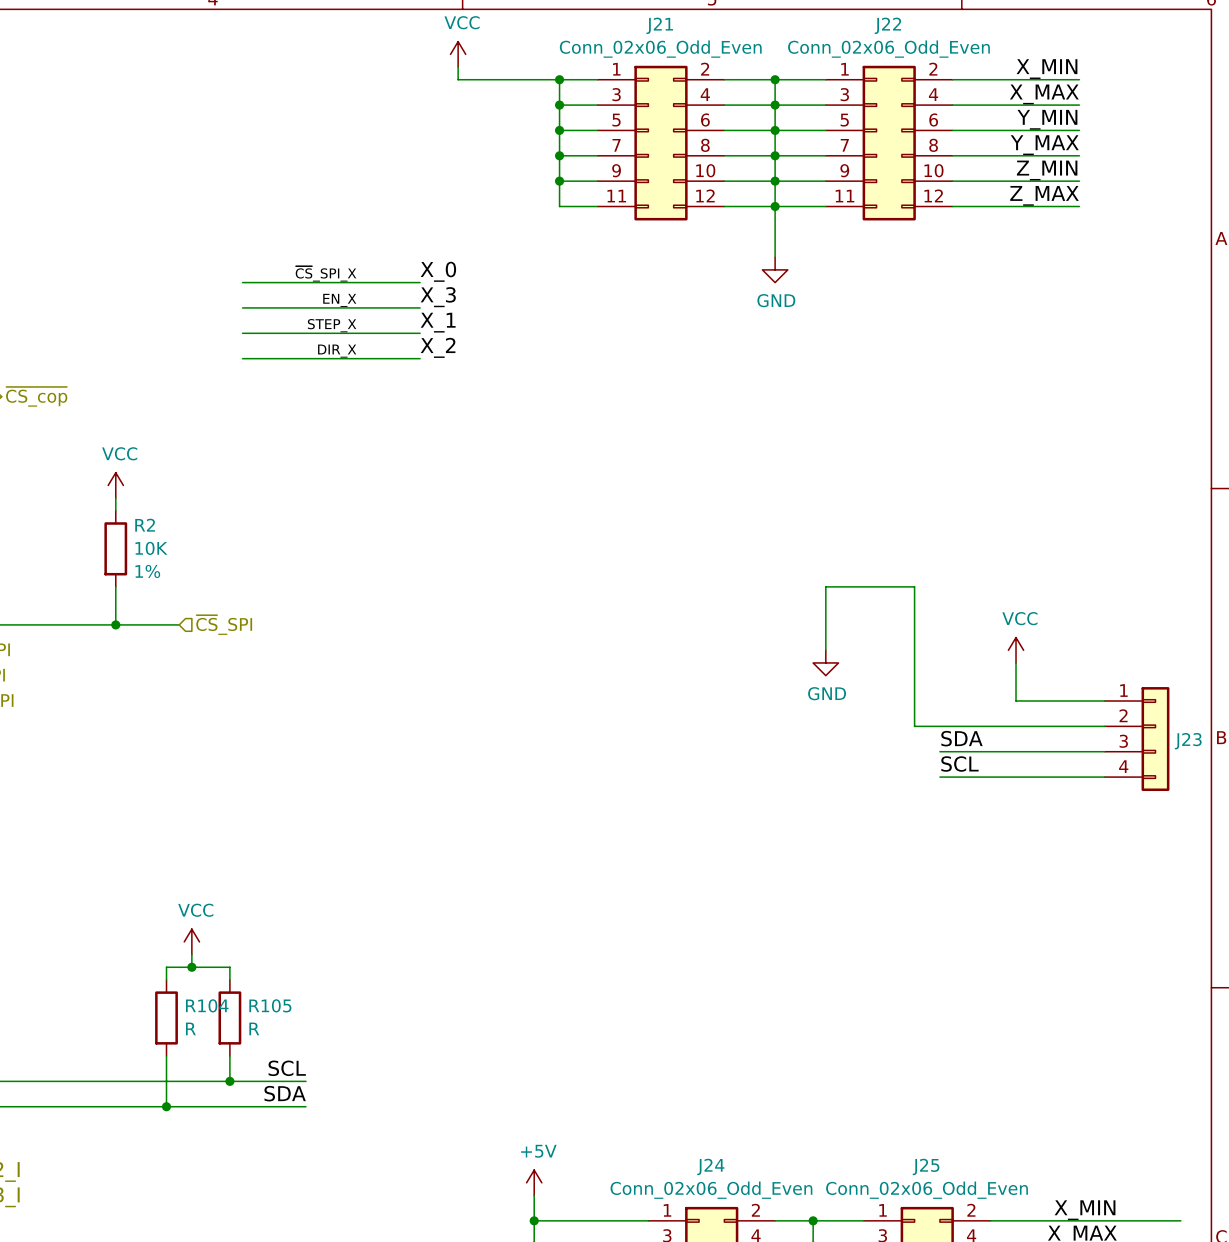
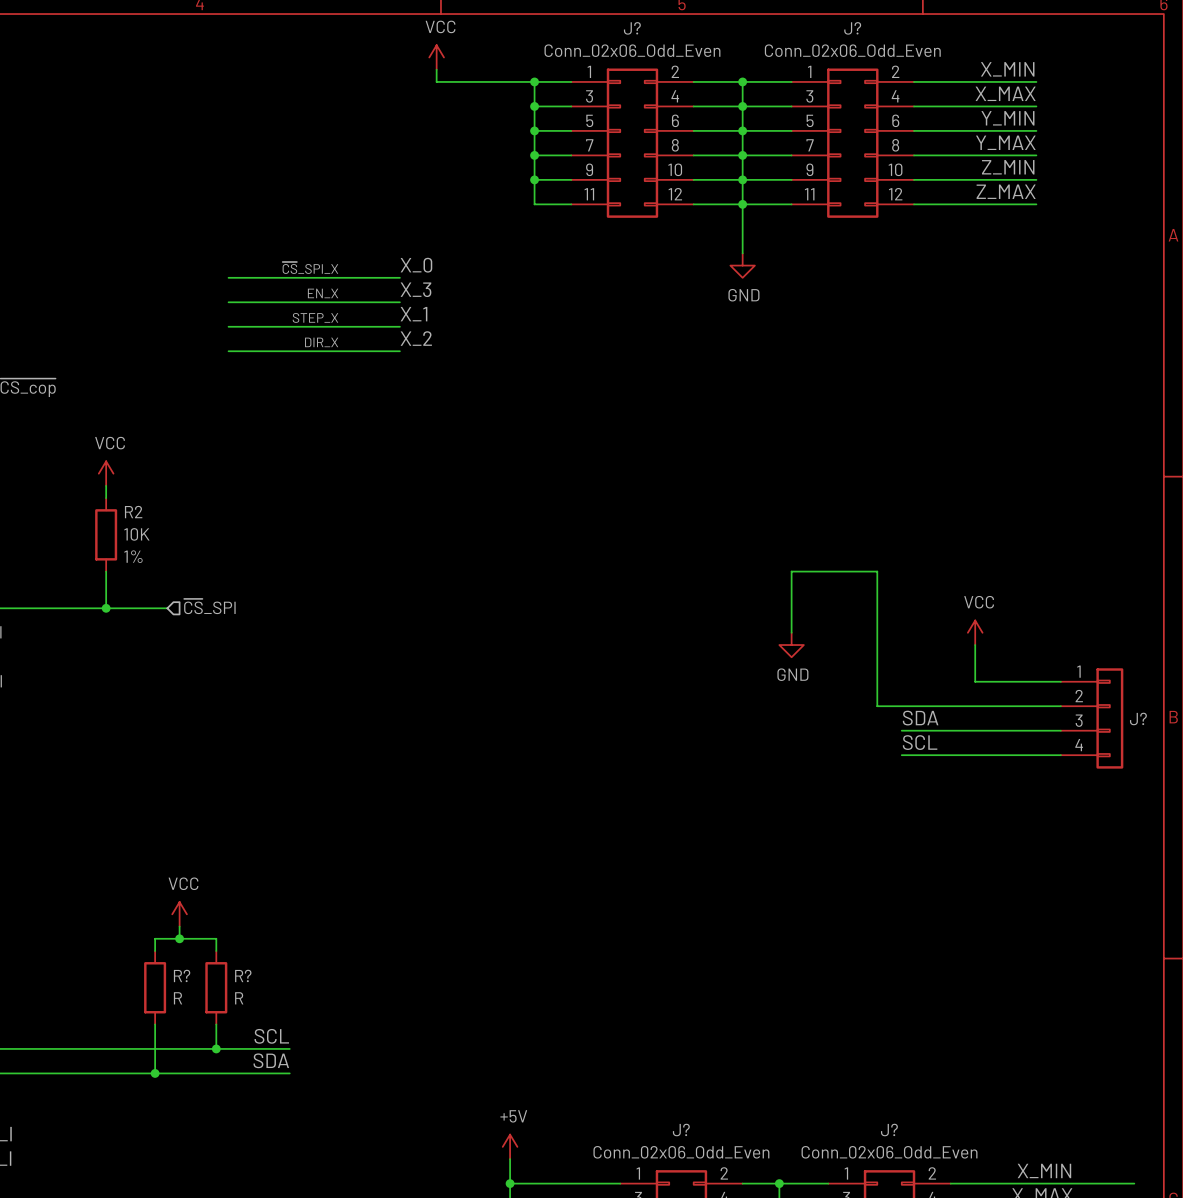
J21 name: J21 (659, 25) -> J? (632, 28)
J22 name: J22 (887, 25) -> J? (852, 28)
J23 name: J23 (1188, 741) -> J? (1138, 718)
R104 name: R104 (207, 1005) -> R? (182, 975)
R105 name: R105 (270, 1005) -> R? (243, 975)
J24 name: J24 (710, 1166) -> J? (681, 1130)
J25 name: J25 (926, 1166) -> J? (889, 1130)

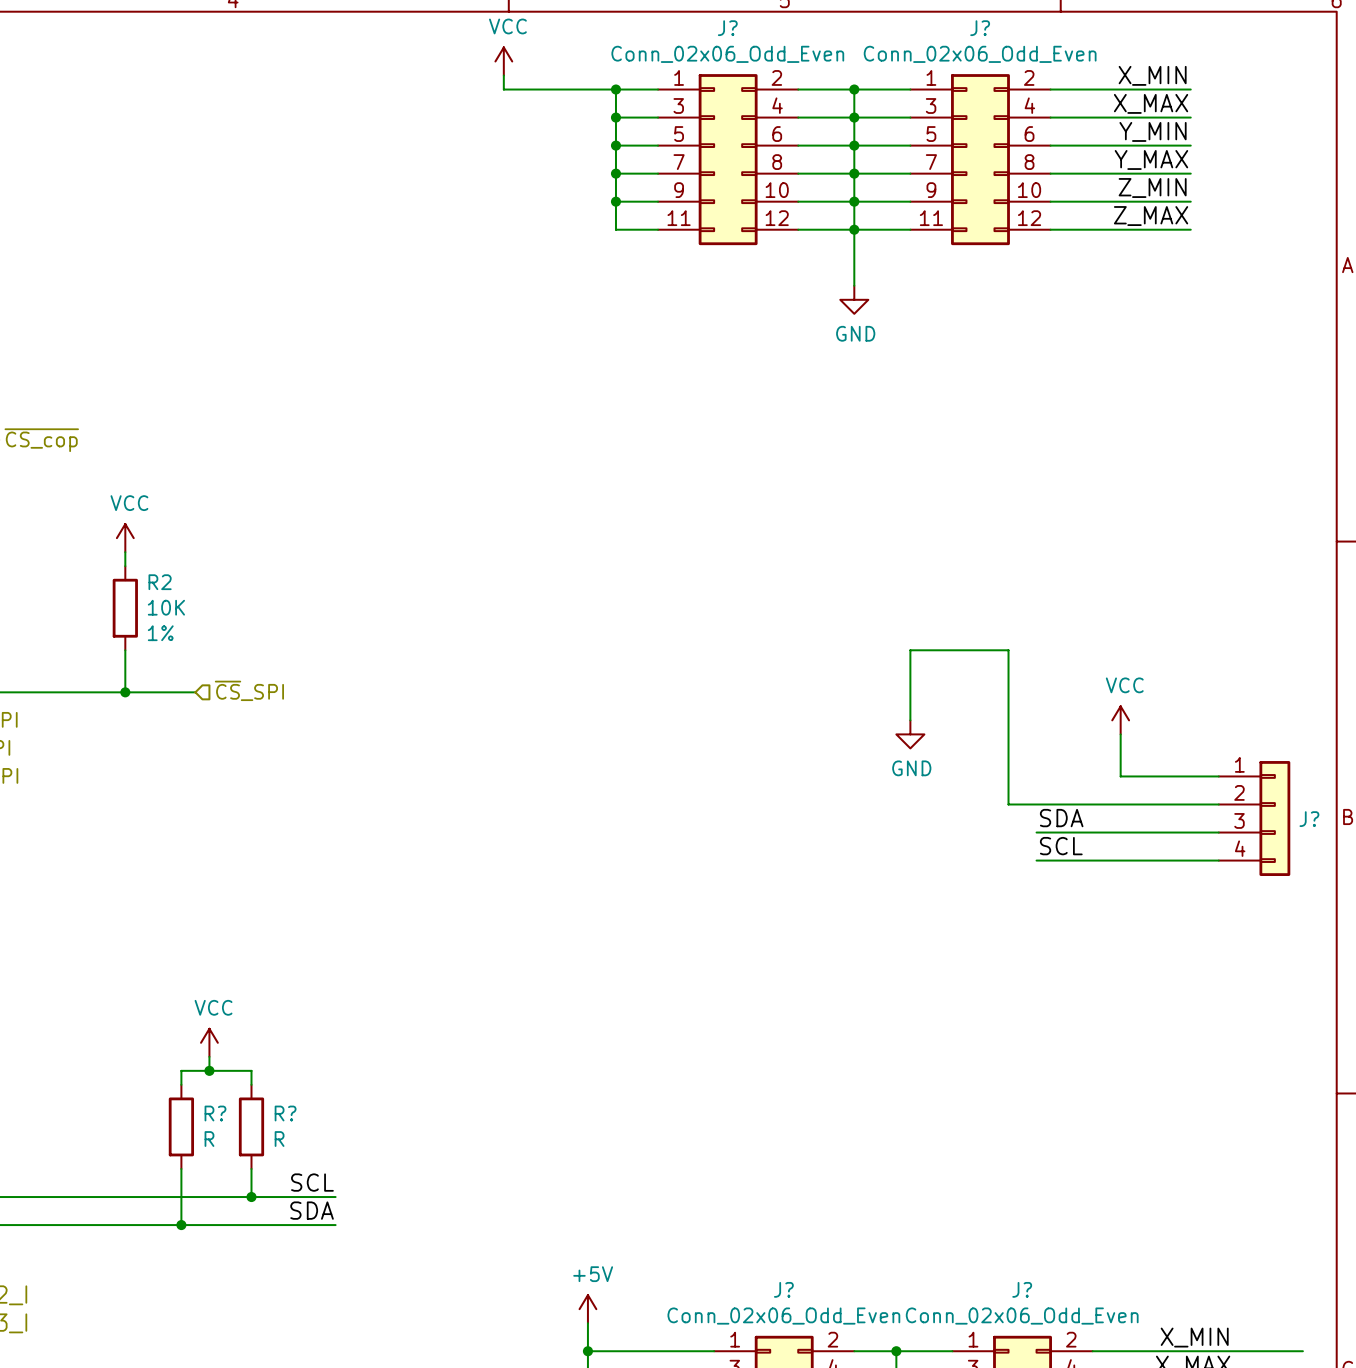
label: X_0 (416, 265) -> none
label: ~{CS}_SPI_X (310, 267) -> none
wire: (228, 277) (399, 277) -> none
label: X_3 (416, 289) -> none
label: EN_X (323, 293) -> none
wire: (228, 302) (399, 302) -> none
label: X_1 (414, 314) -> none
label: STEP_X (315, 317) -> none
wire: (228, 326) (399, 326) -> none
label: X_2 (416, 338) -> none
label: DIR_X (321, 342) -> none
wire: (228, 351) (399, 351) -> none

